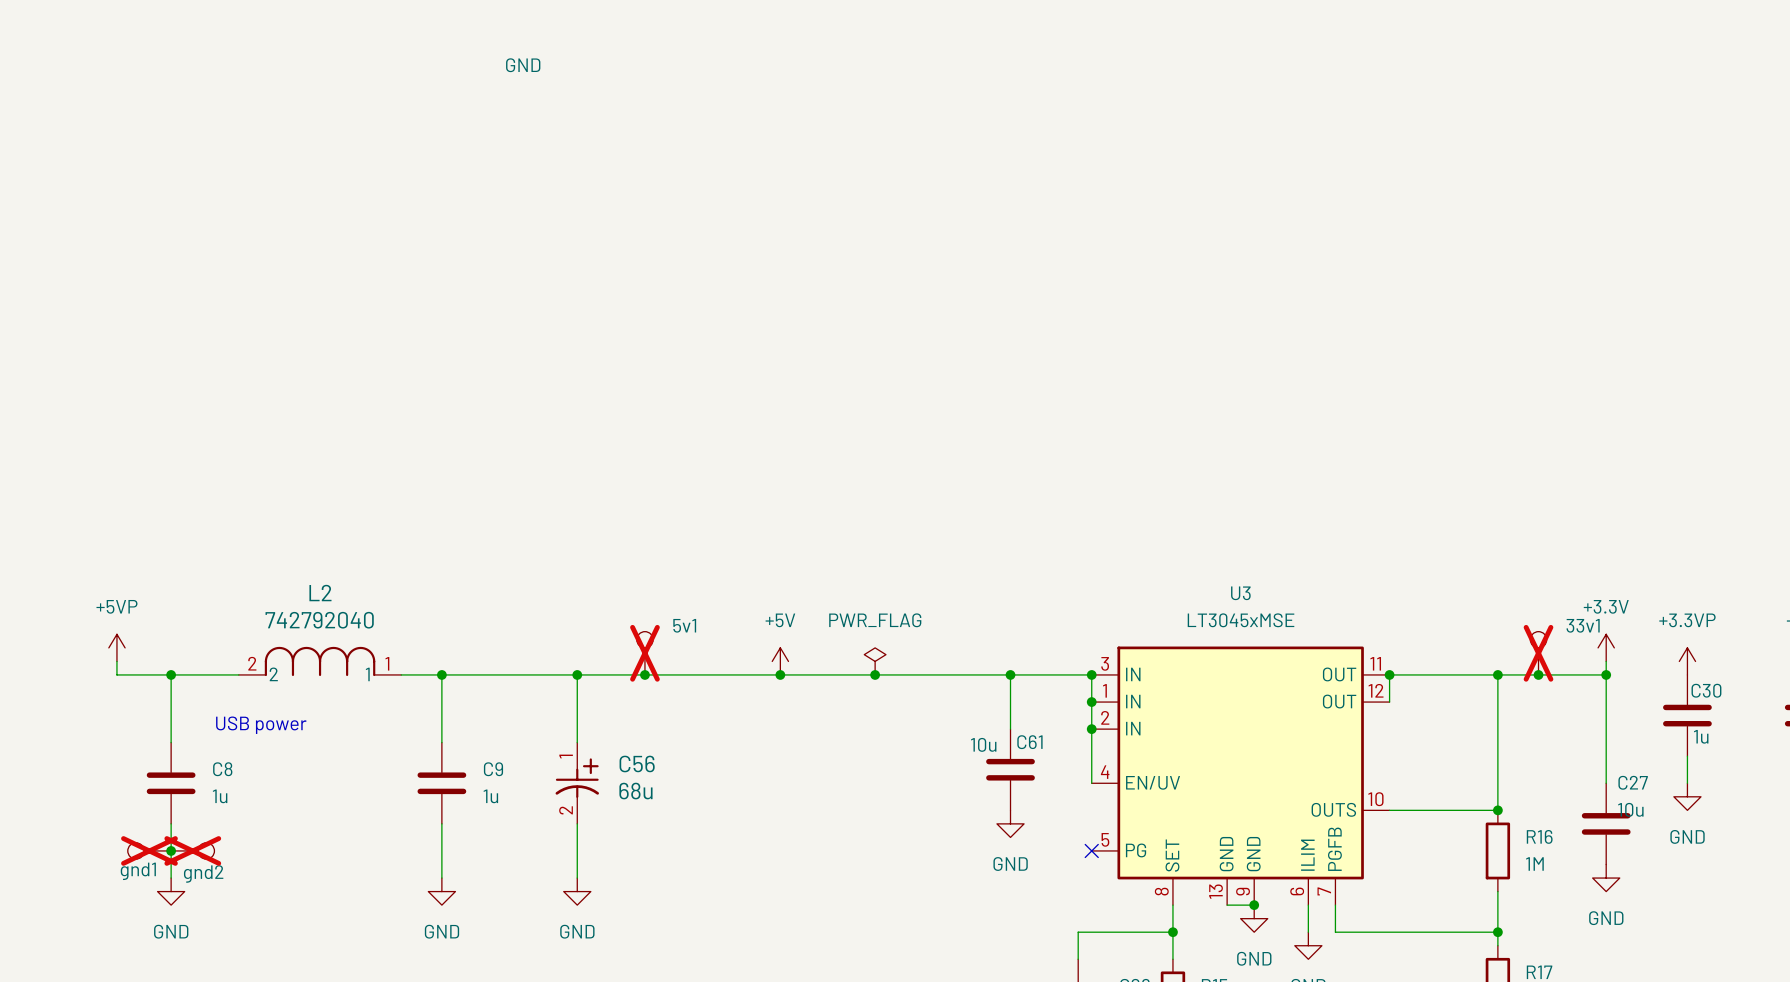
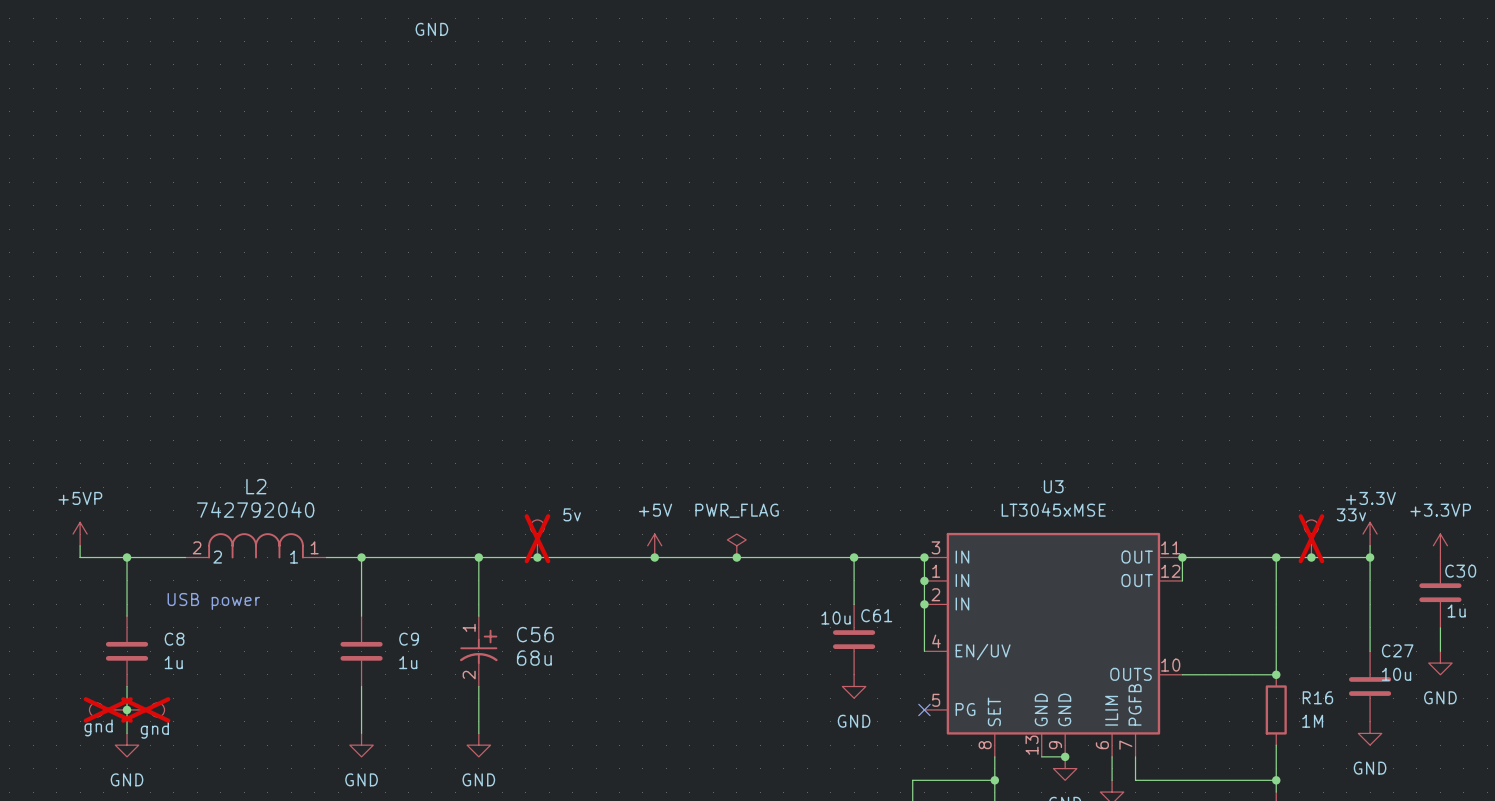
5v1 name: 5v1 (684, 625) -> 5v (572, 514)
33v1 name: 33v1 (1583, 625) -> 33v (1351, 514)
gnd1 name: gnd1 (138, 871) -> gnd (98, 727)
gnd2 name: gnd2 (203, 873) -> gnd (154, 730)

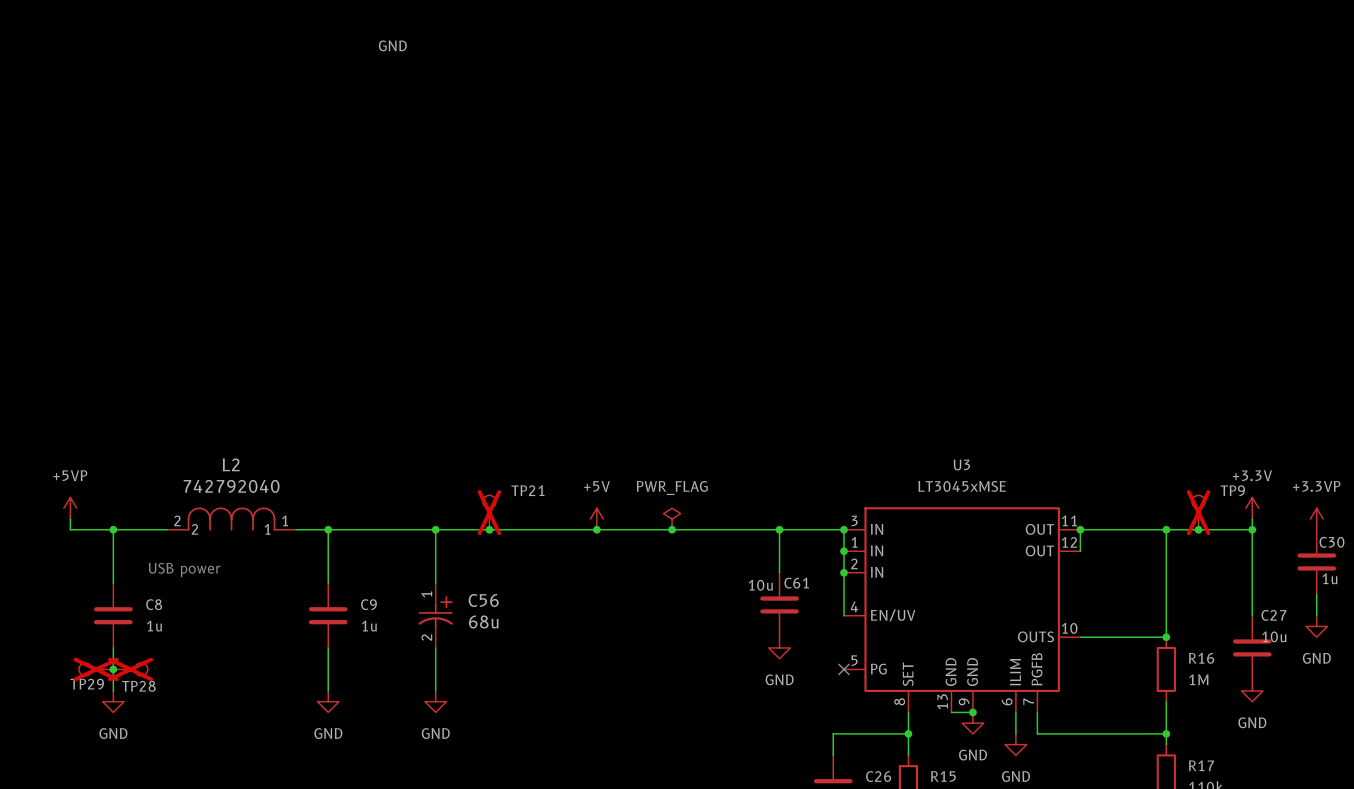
5v name: 5v (572, 514) -> TP21 (527, 490)
33v name: 33v (1351, 514) -> TP9 (1232, 490)
gnd name: gnd (98, 727) -> TP29 (87, 684)
gnd name: gnd (154, 730) -> TP28 (138, 686)

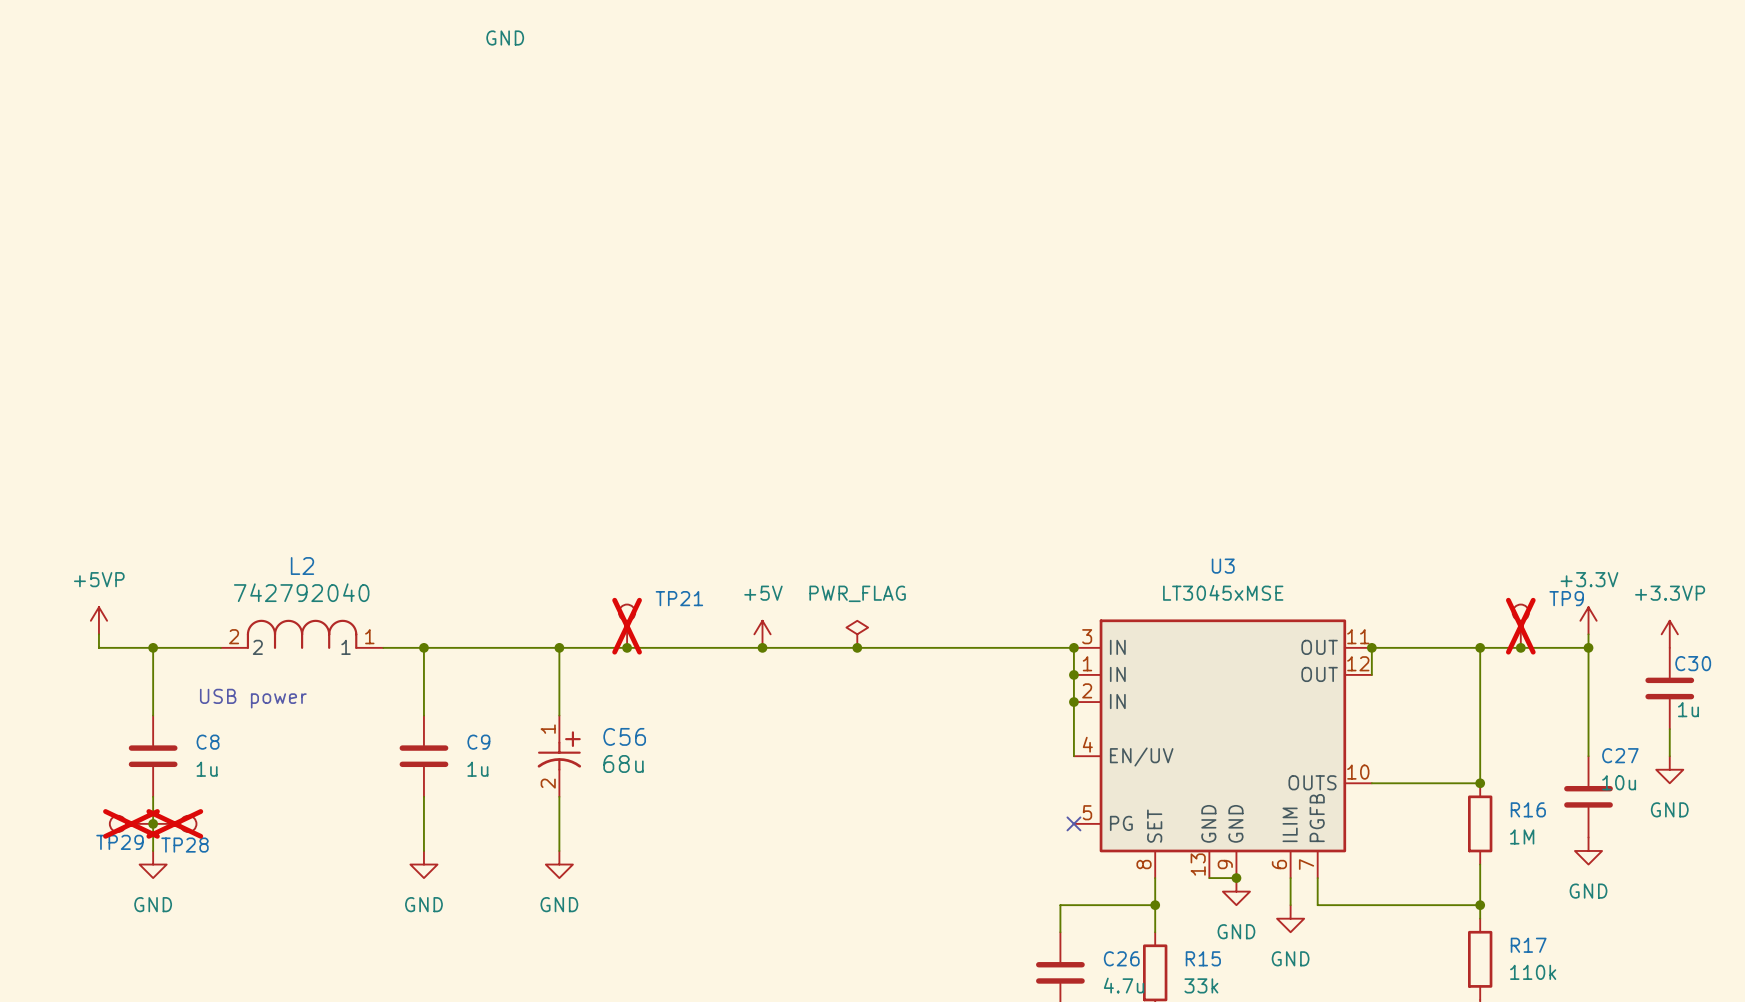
wire: (779, 529) (779, 572) -> none
junction: (779, 529) -> none
C61: 10u (779, 604) -> none
power symbol: GND (779, 647) -> none

